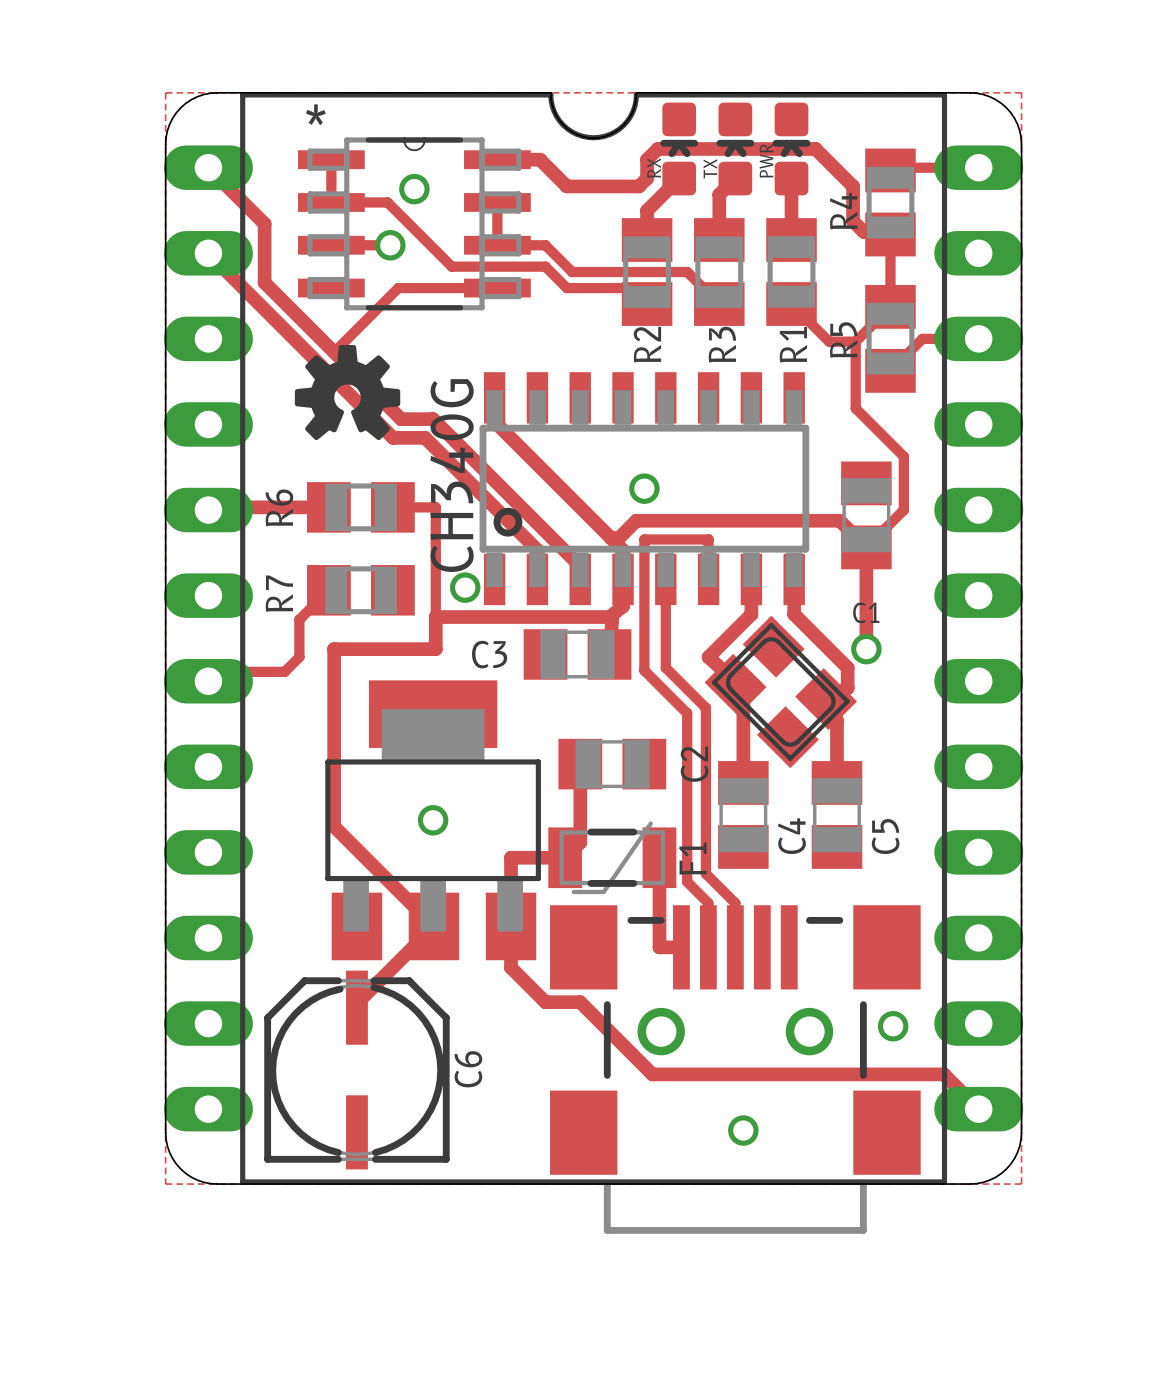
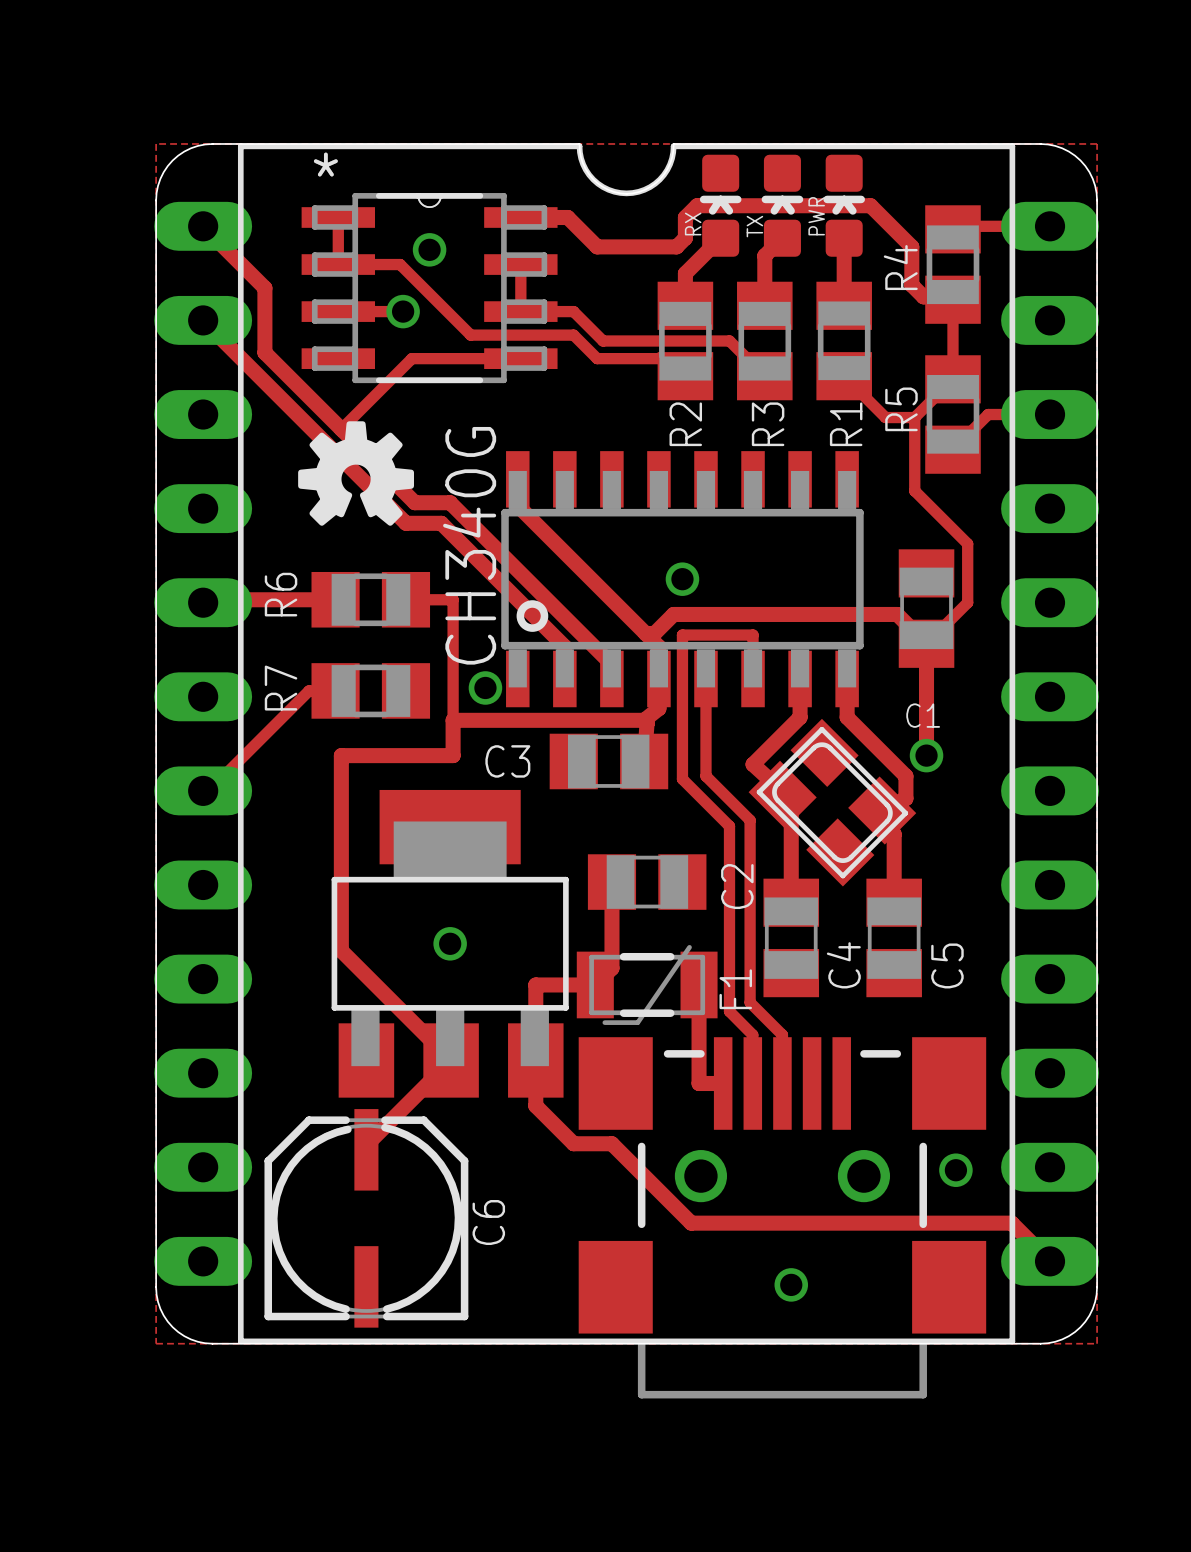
track: (328, 590) (299, 619) (299, 657) (284, 671) (223, 671) -> (335, 690) (309, 690) (219, 780)

